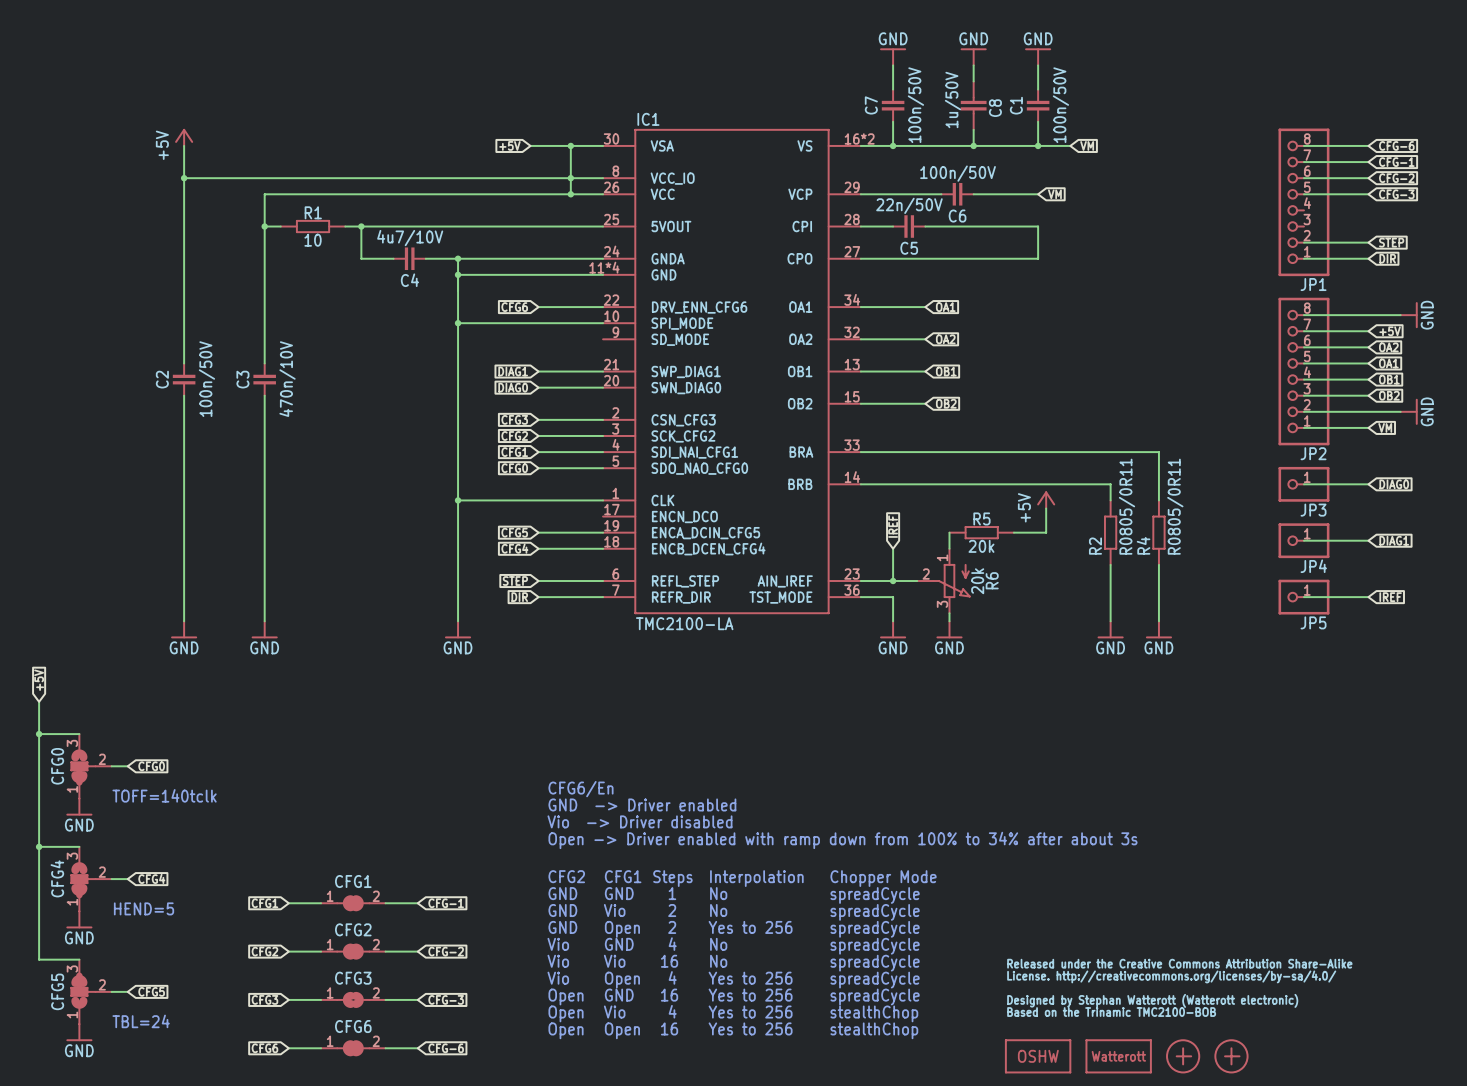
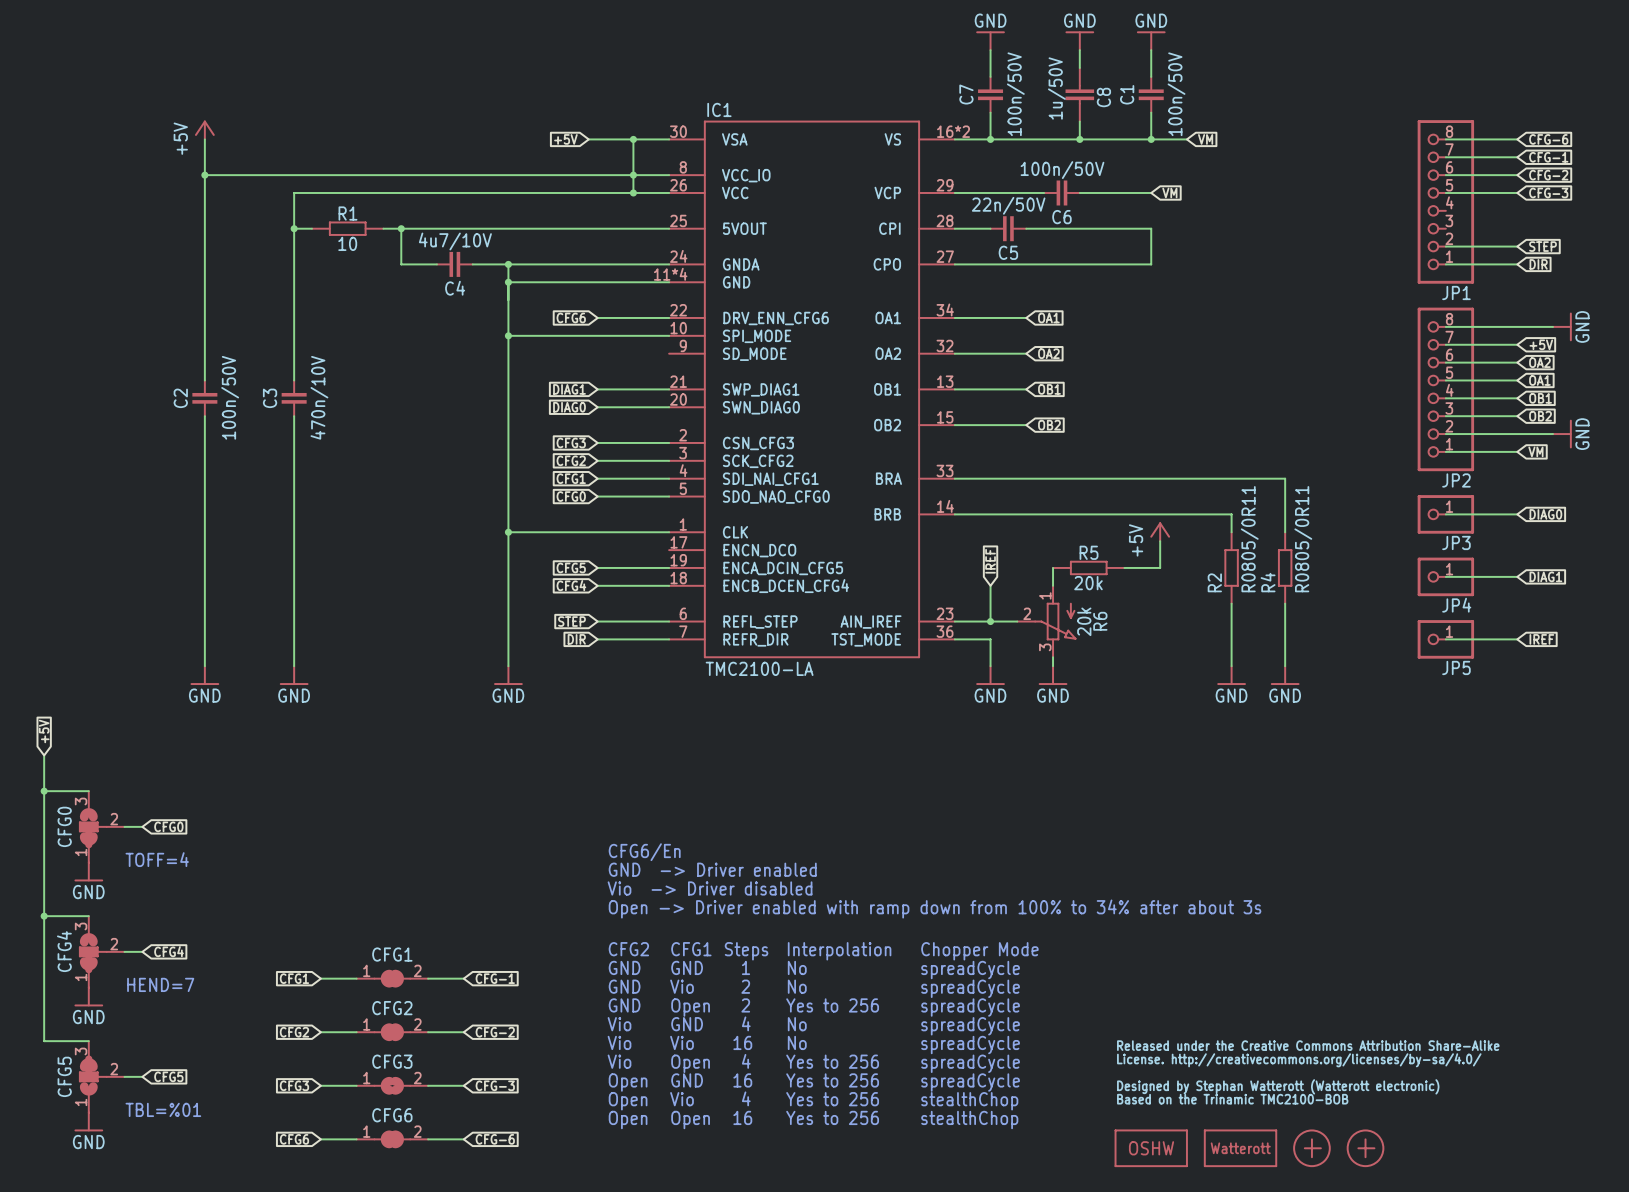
text: TOFF=140tclk (164, 795) -> TOFF=4 (157, 859)
text: HEND=5 (144, 908) -> HEND=7 (160, 984)
text: TBL=24 (141, 1021) -> TBL=%01 (163, 1109)

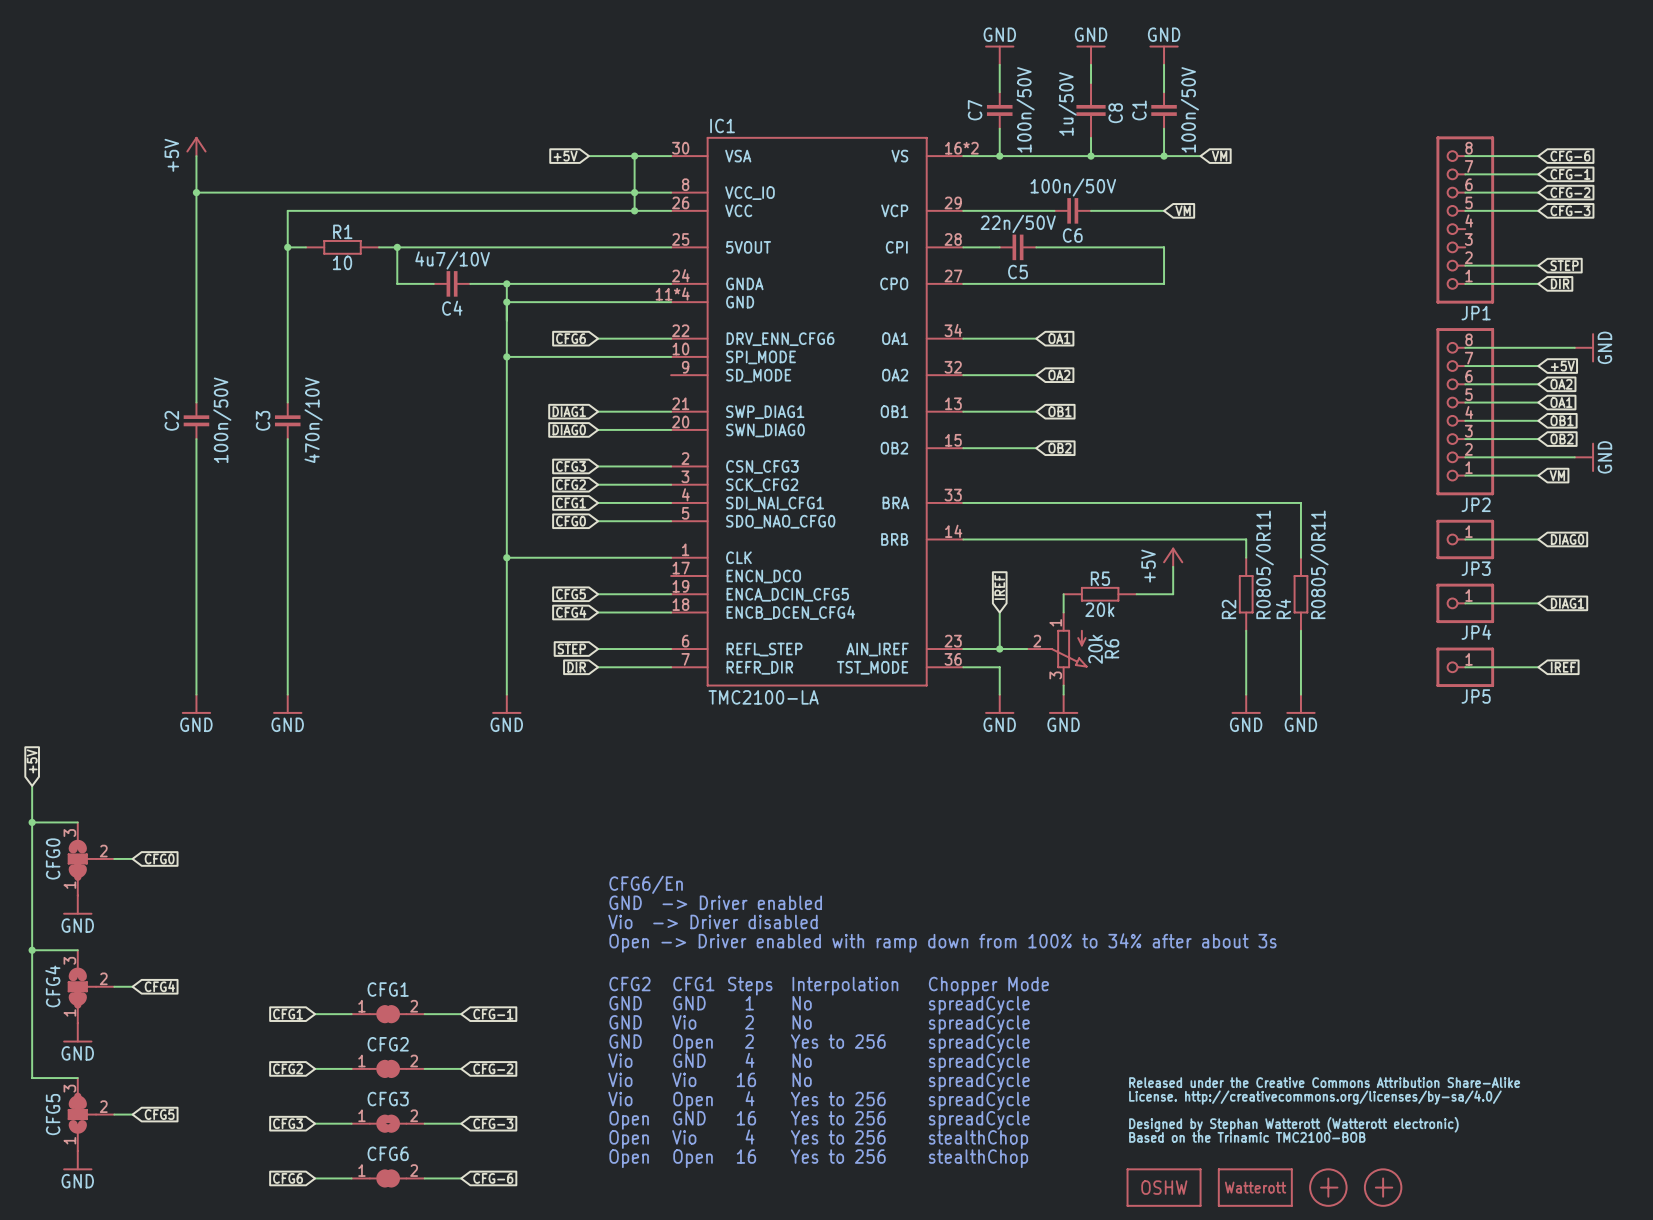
text: TOFF=4 (157, 859) -> none
text: HEND=7 (160, 984) -> none
text: TBL=%01 (163, 1109) -> none

